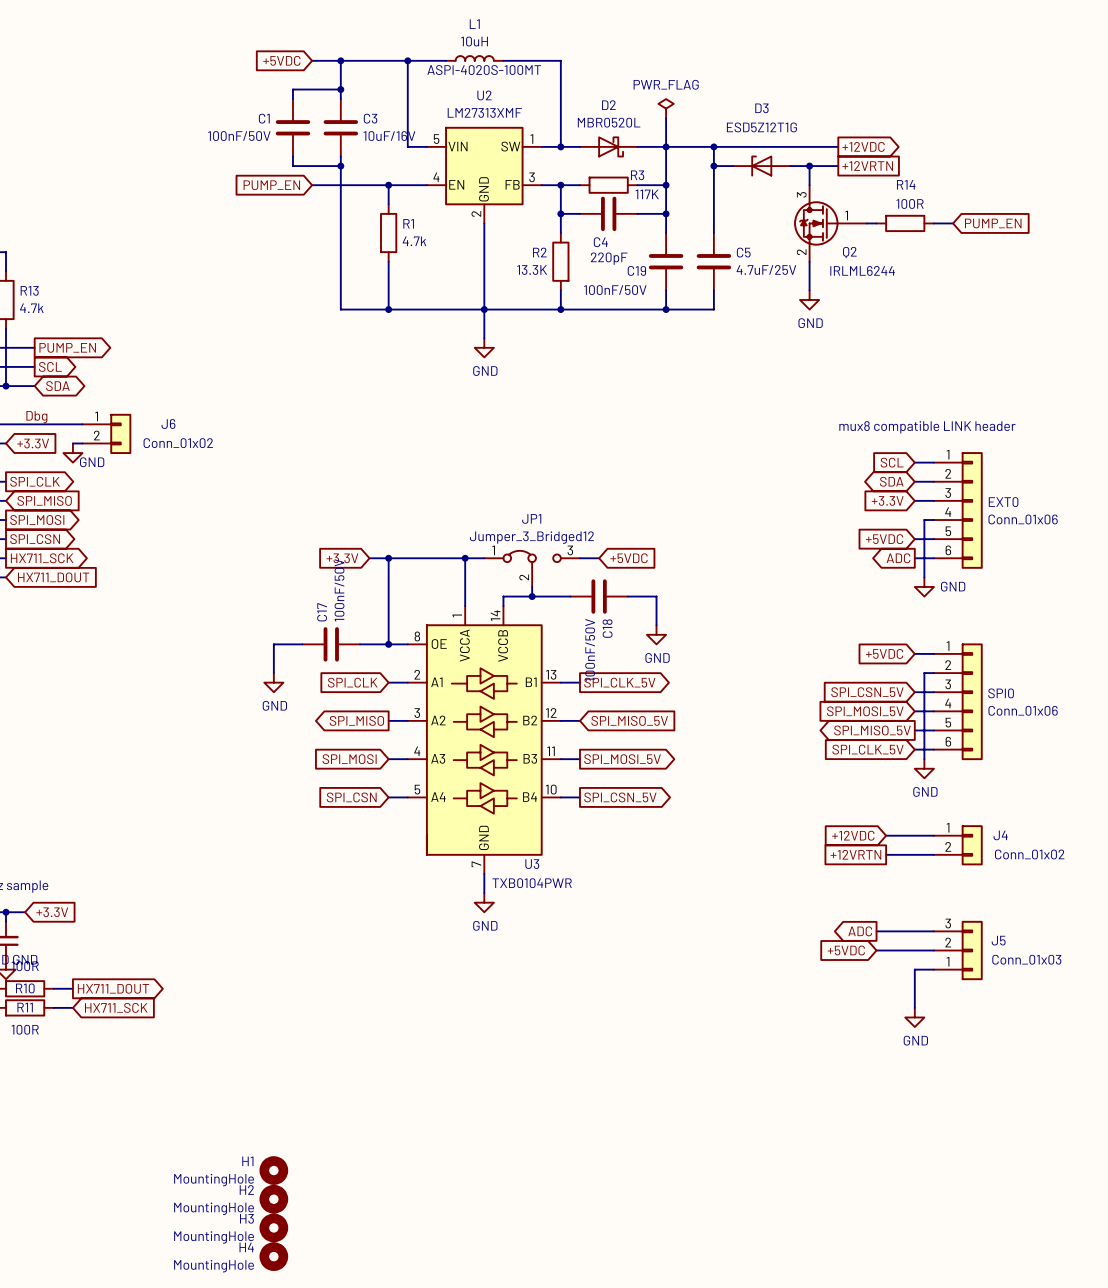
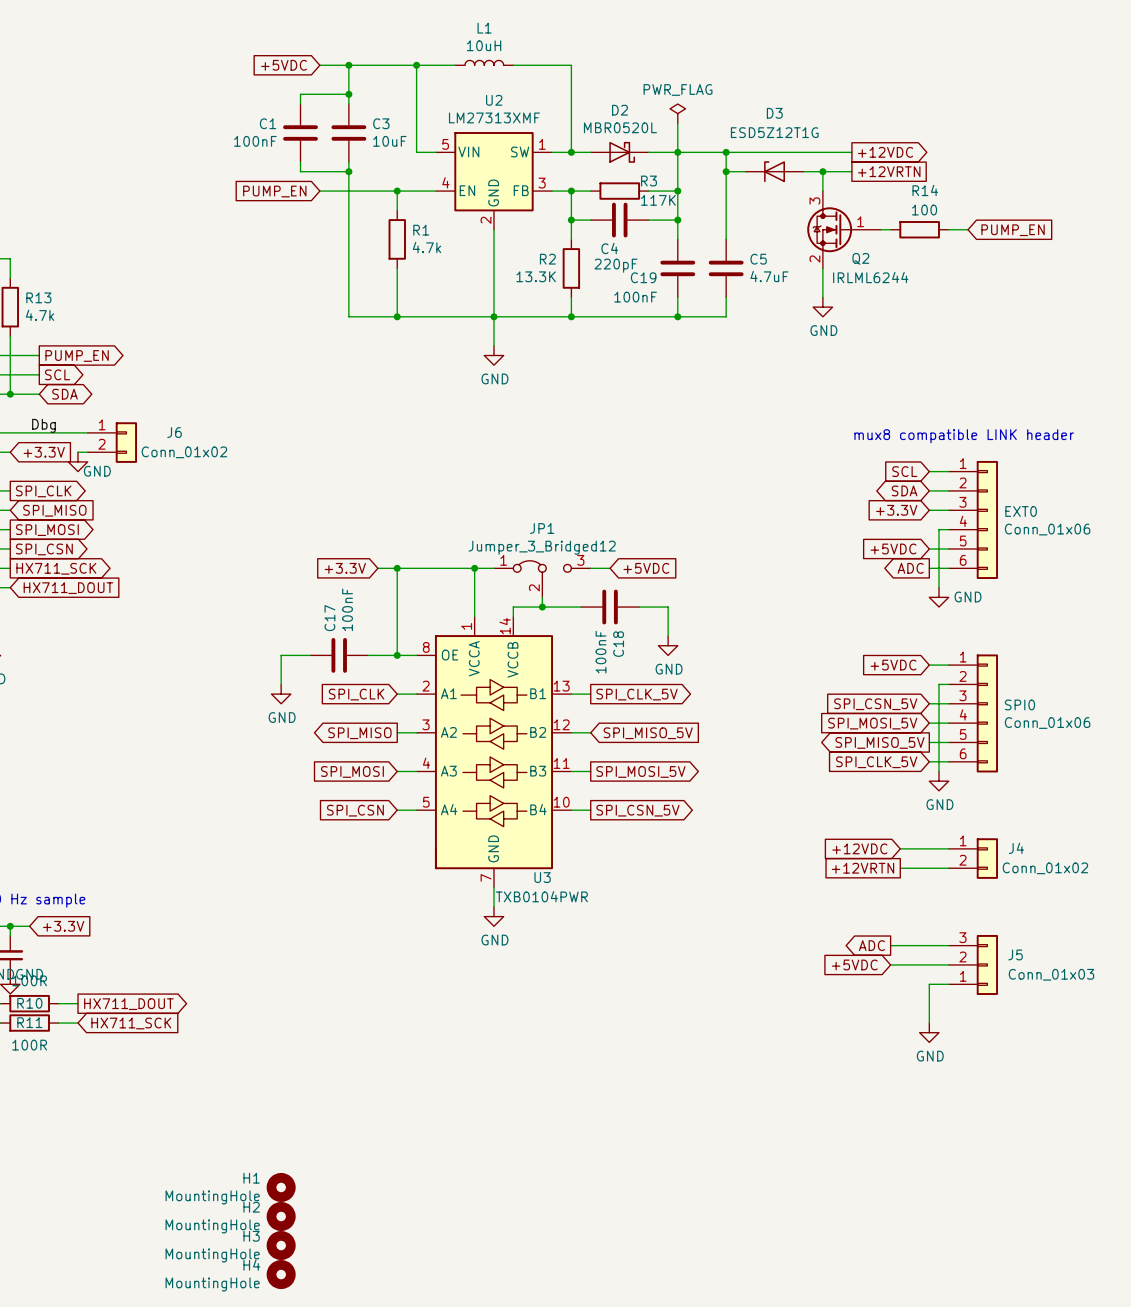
L1 text: ASPI-4020S-100MT (484, 70) -> none
C1 value: 100nF/50V (239, 136) -> 100nF (255, 141)
C3 value: 10uF/16V (389, 136) -> 10uF (389, 141)
R14 value: 100R (910, 203) -> 100 (924, 210)
C5 value: 4.7uF/25V (766, 269) -> 4.7uF (769, 276)
C19 value: 100nF/50V (615, 290) -> 100nF (635, 297)
C17 value: 100nF/50V (339, 590) -> 100nF (347, 609)
C18 value: 100nF/50V (590, 650) -> 100nF (601, 652)

